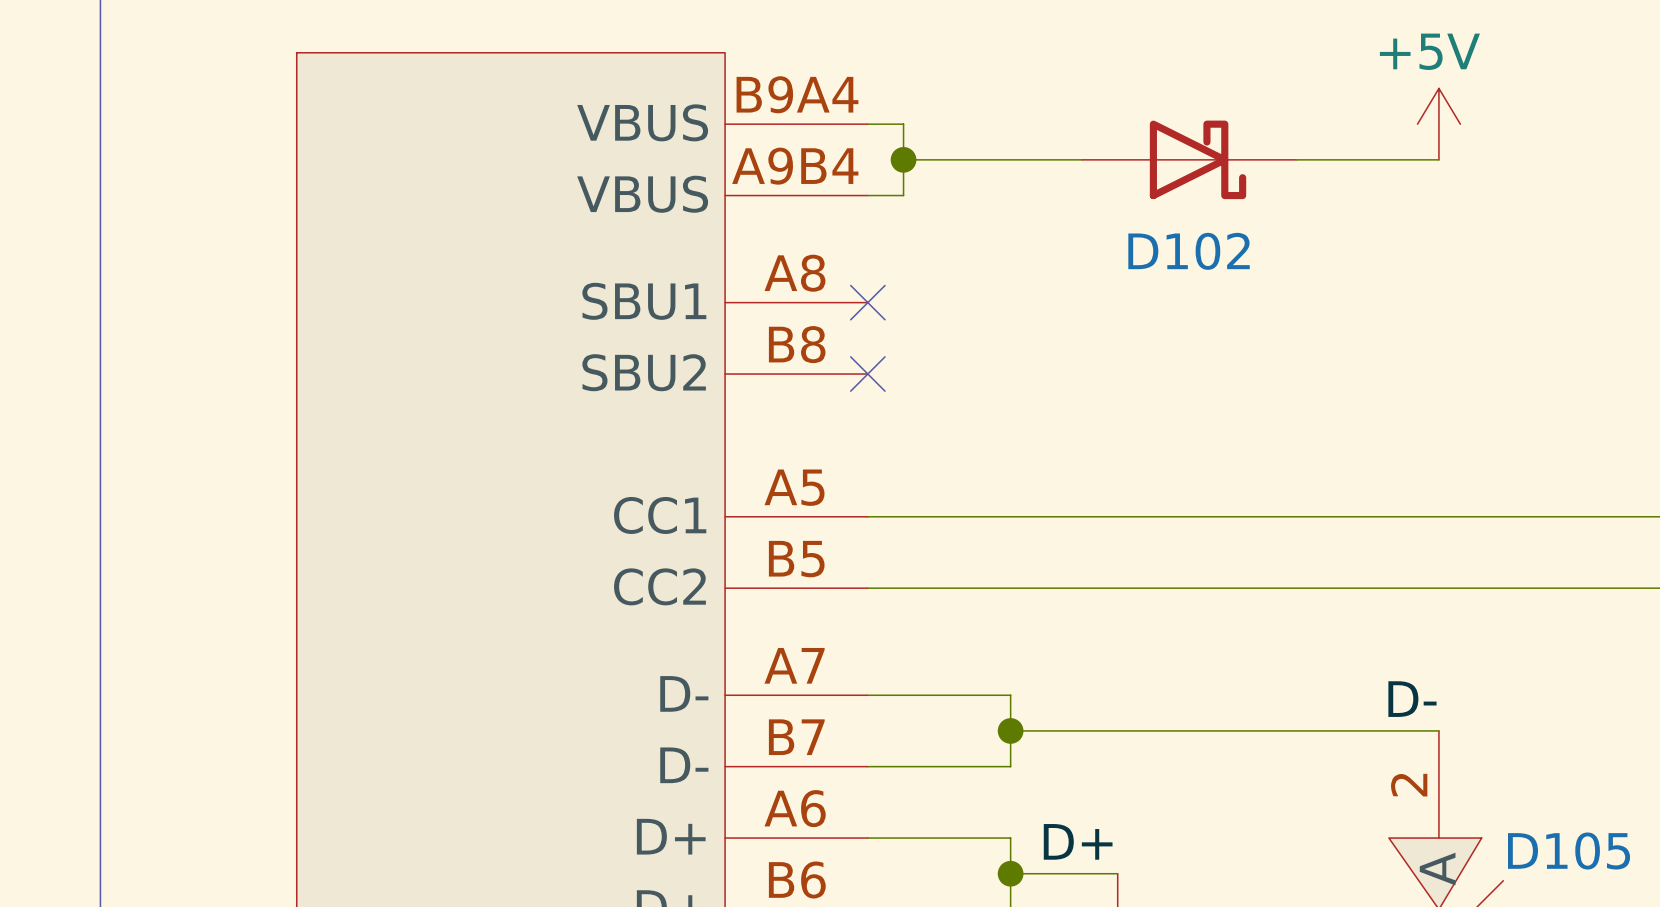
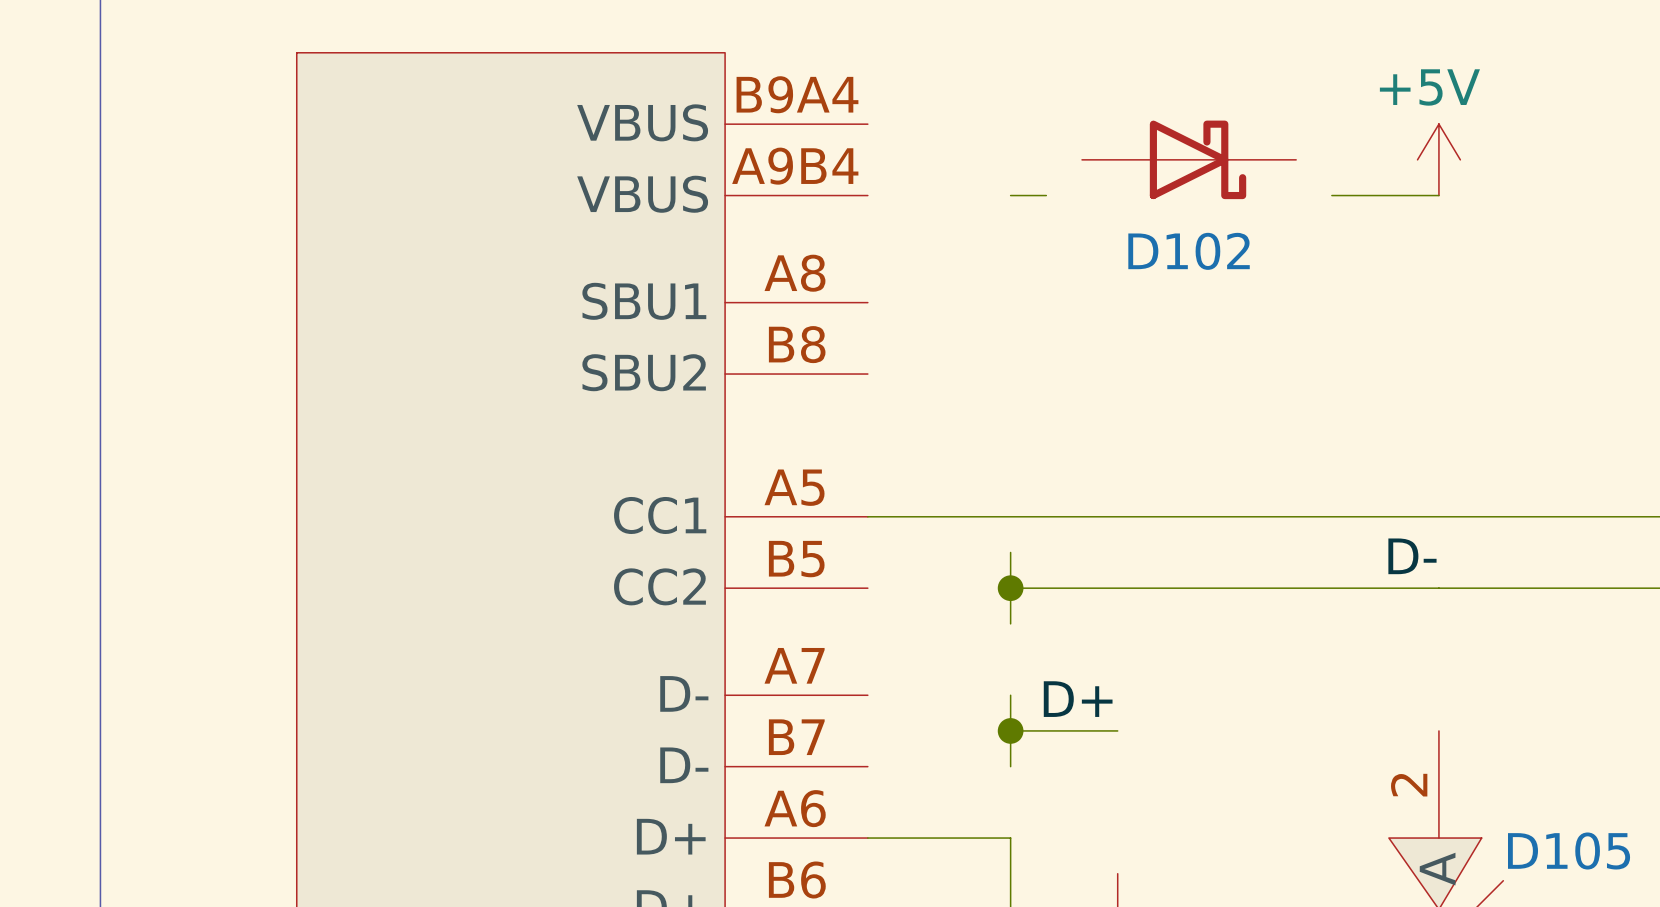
wire: (867, 124) (903, 124) (903, 195) (867, 195) -> none
power symbol position: +5V (1438, 124) -> +5V (1438, 159)
wire: (903, 159) (1082, 159) -> none
junction: (903, 159) -> none
wire: (1296, 159) (1438, 159) -> none
wire: none -> (1010, 195) (1046, 195)
wire: none -> (1331, 195) (1438, 195)
no-connect mark: (867, 302) -> none
no-connect mark: (867, 374) -> none
wire: none -> (1010, 552) (1010, 623)
wire: (867, 588) (1010, 588) -> none
junction: none -> (1010, 588)
wire: (867, 695) (1010, 695) -> none
label position: D- (1412, 699) -> D- (1412, 556)
wire: (1117, 730) (1438, 730) -> none
wire: (867, 766) (1010, 766) -> none
label position: D+ (1078, 841) -> D+ (1078, 699)
wire: (1010, 873) (1117, 873) -> none
junction: (1010, 873) -> none

